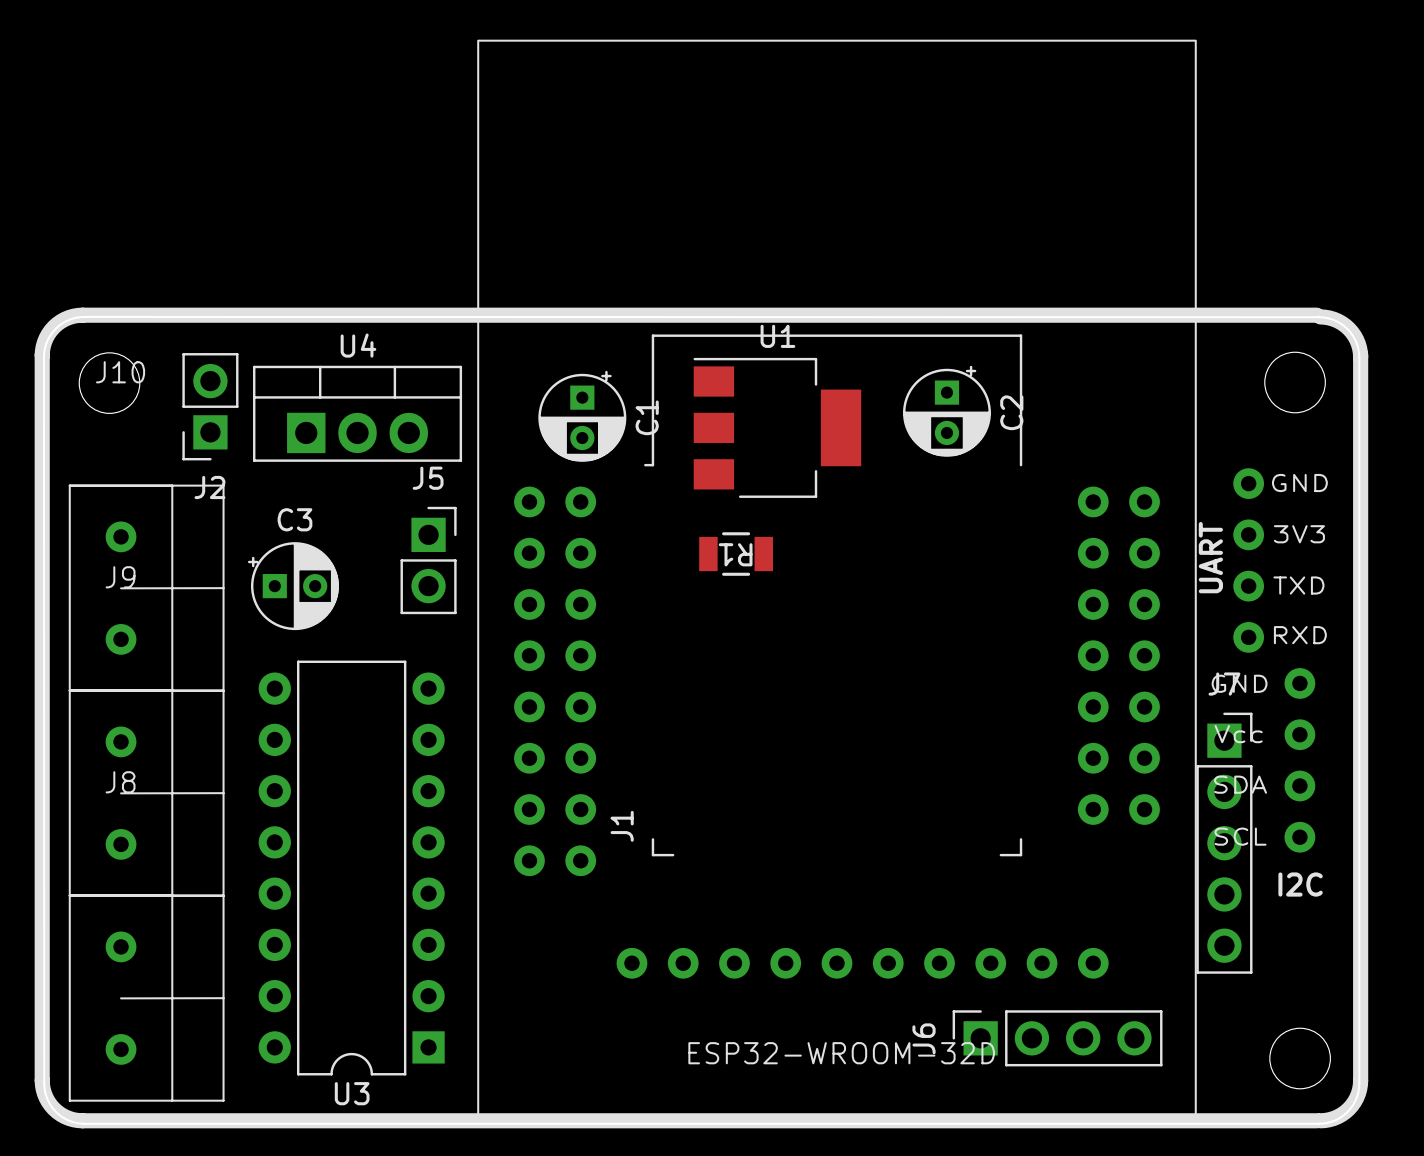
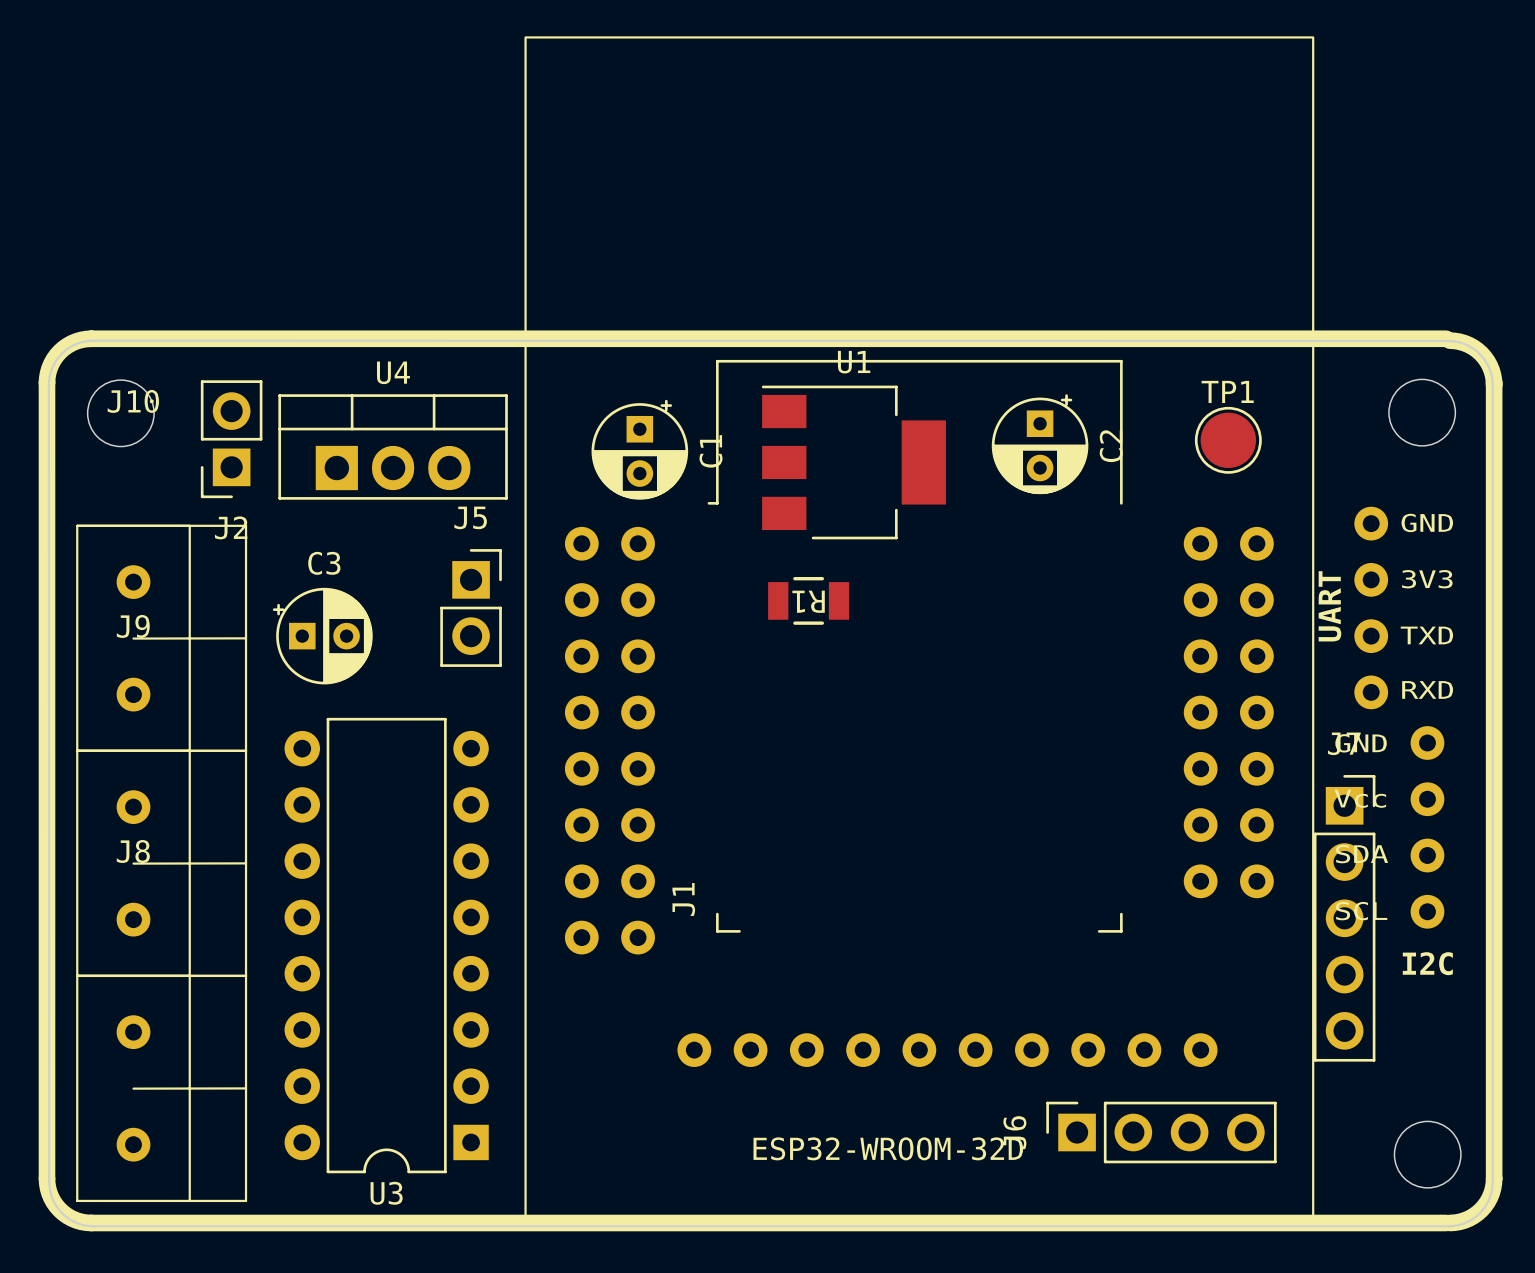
TP1: none -> (1228, 440)

